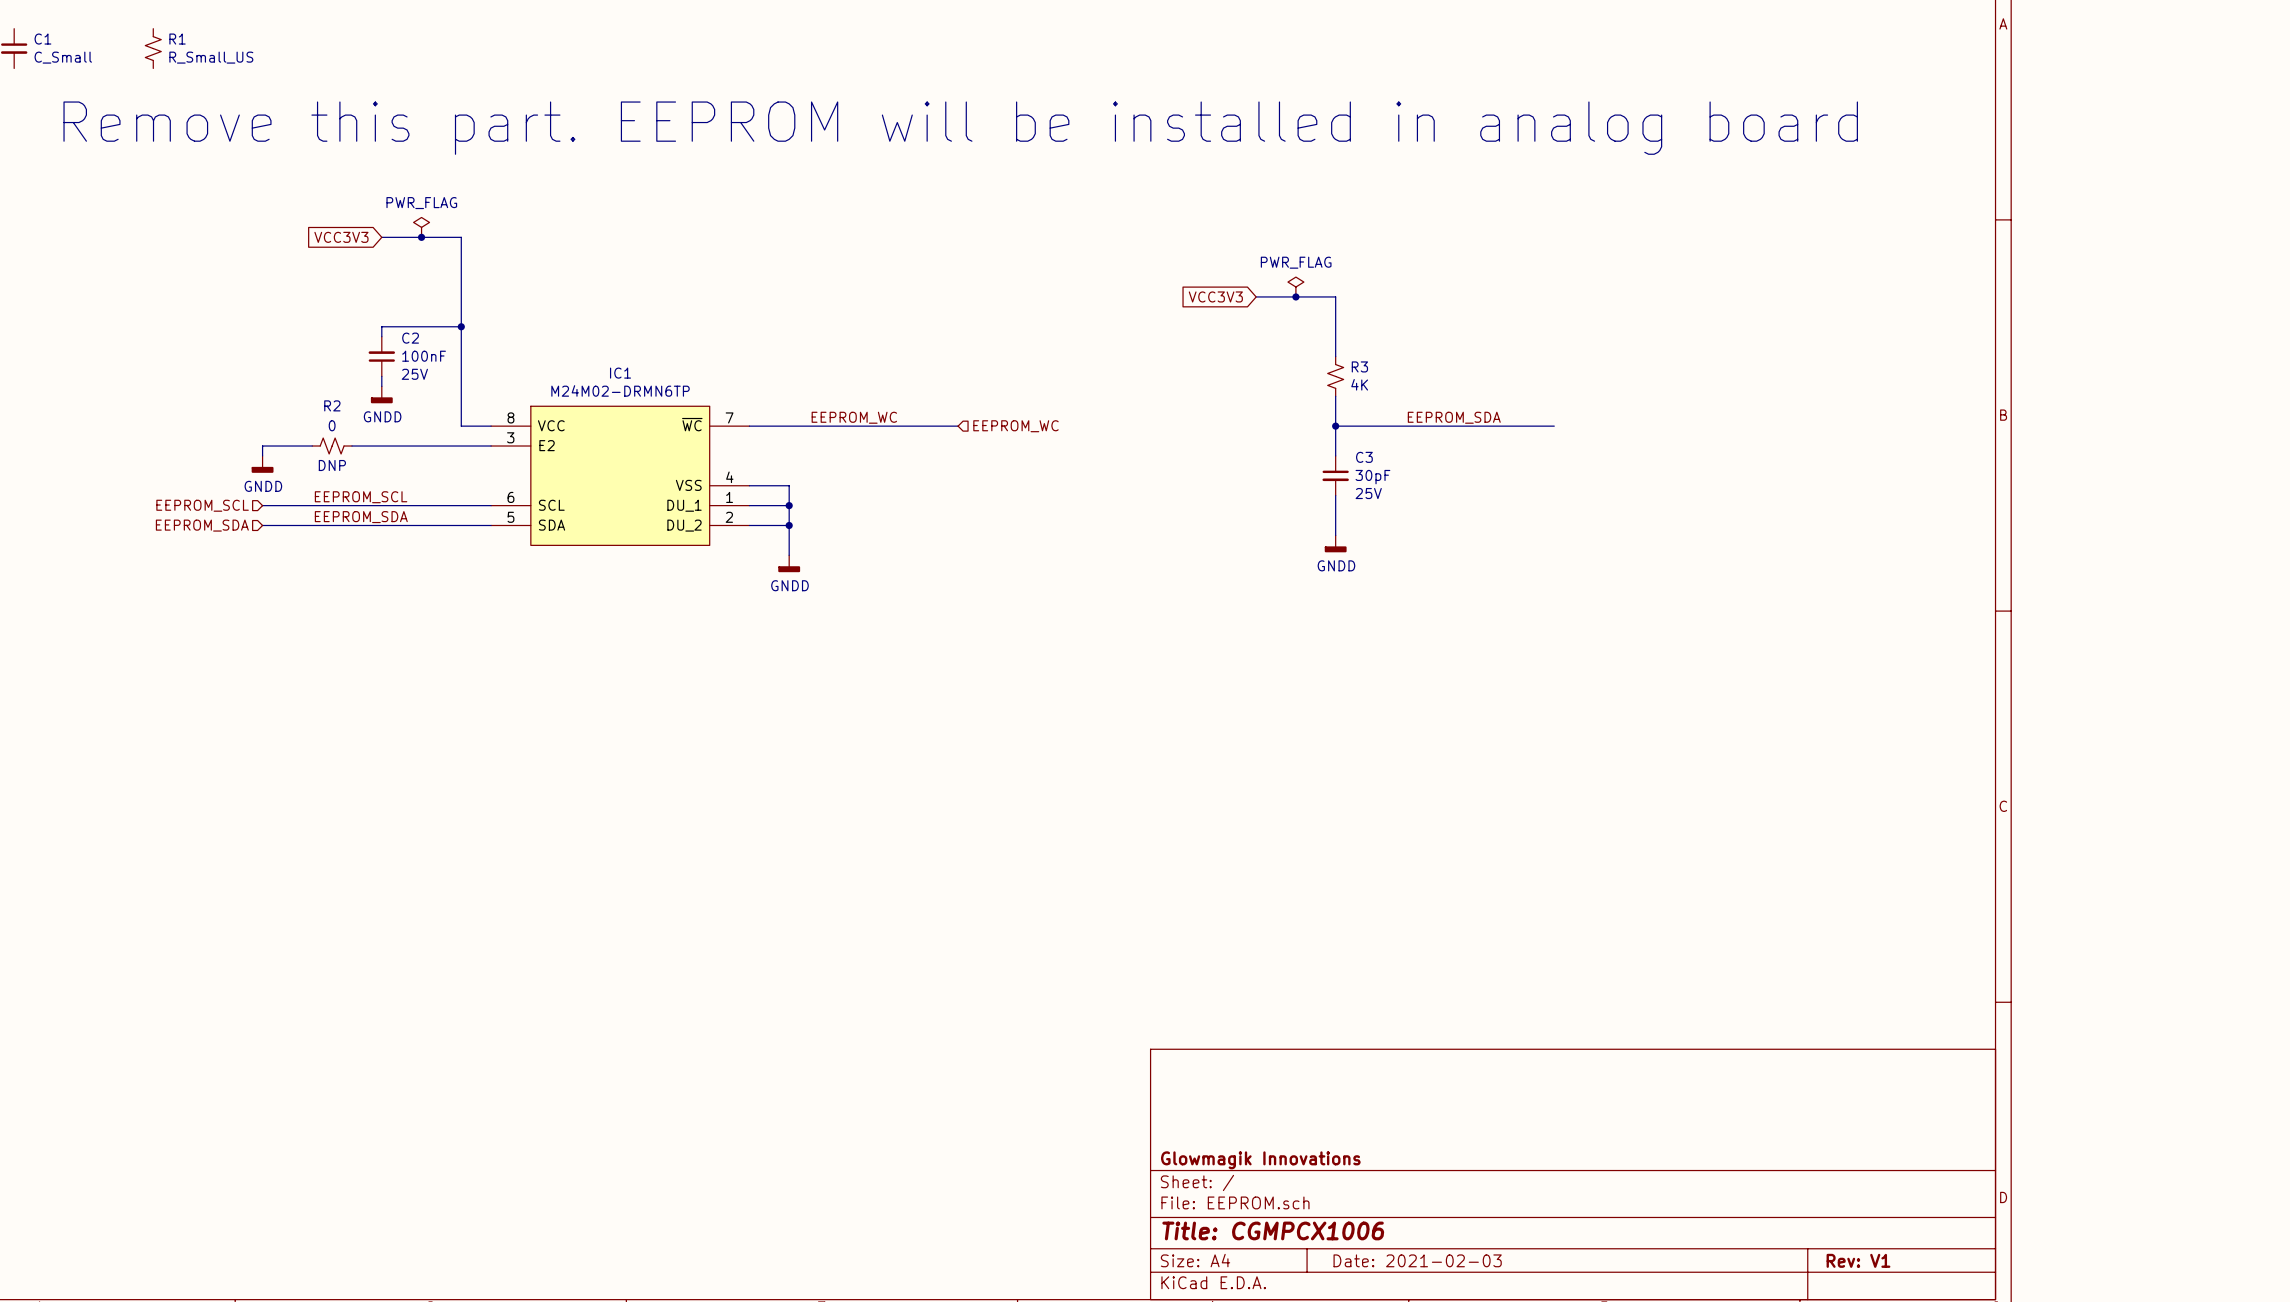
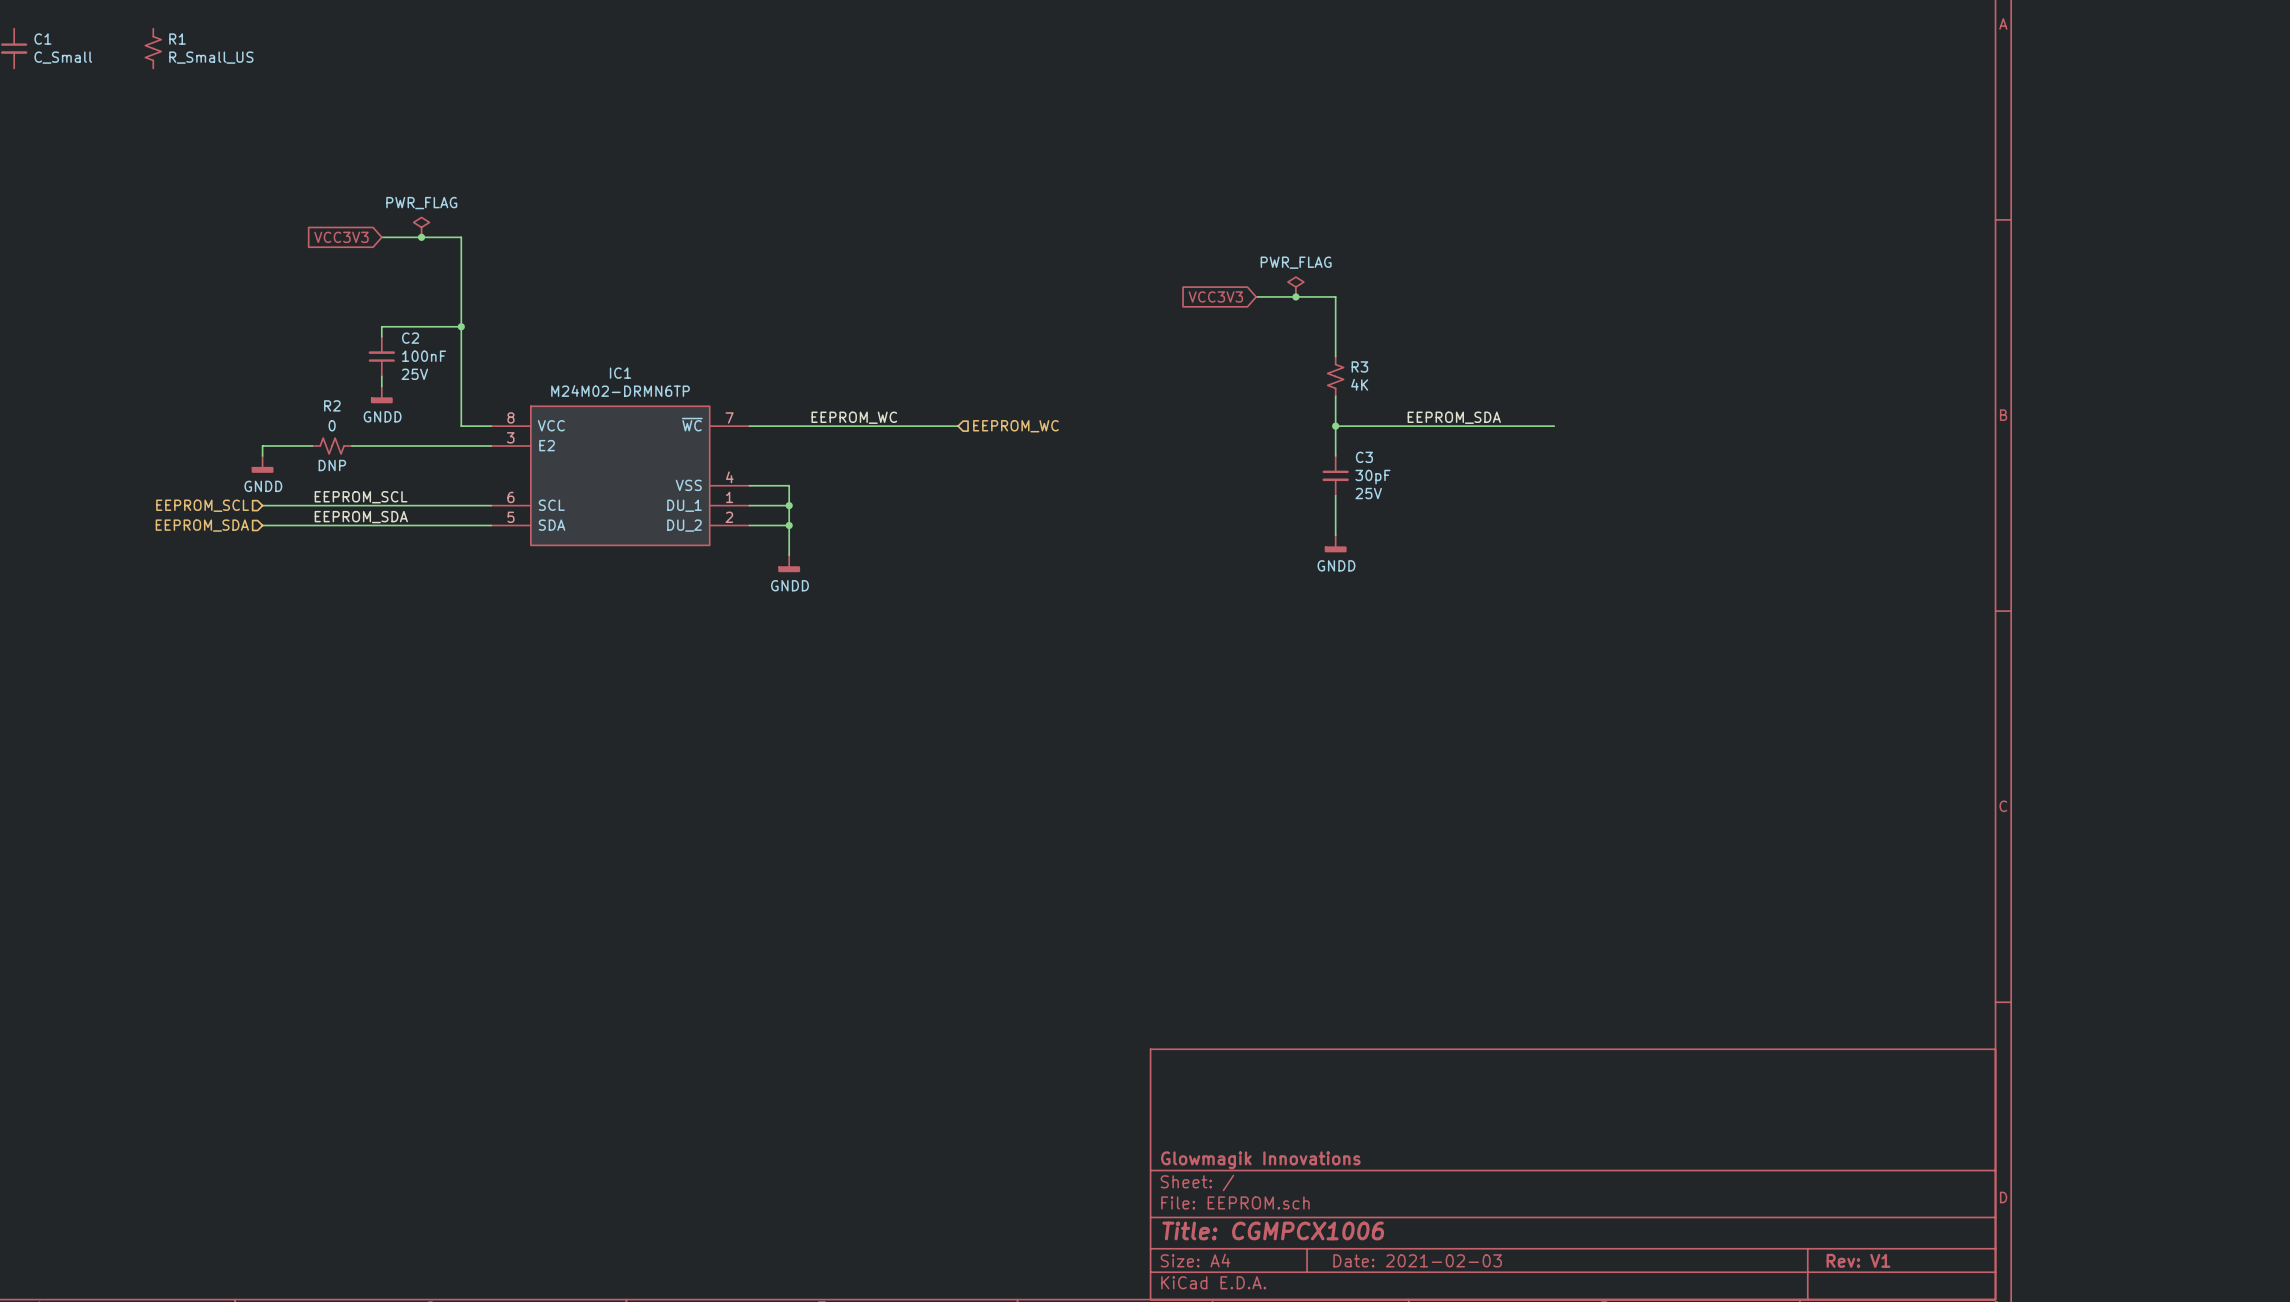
text: Remove this part. EEPROM will be installed in analog board (960, 128) -> none

